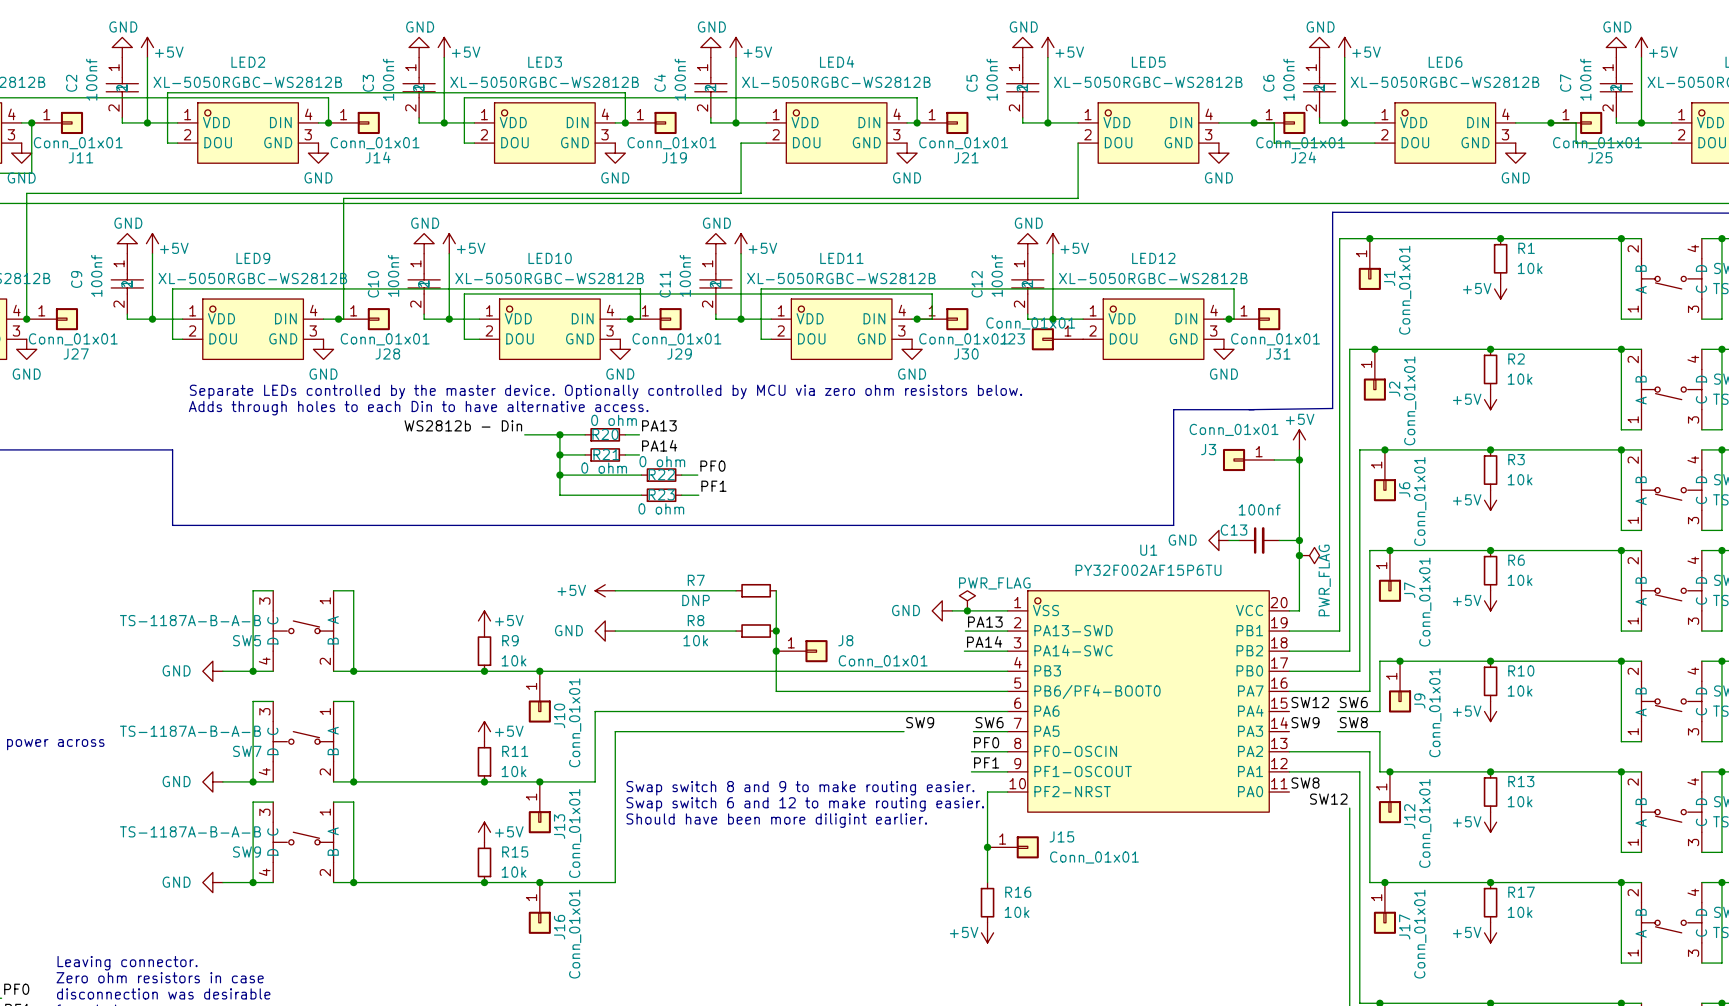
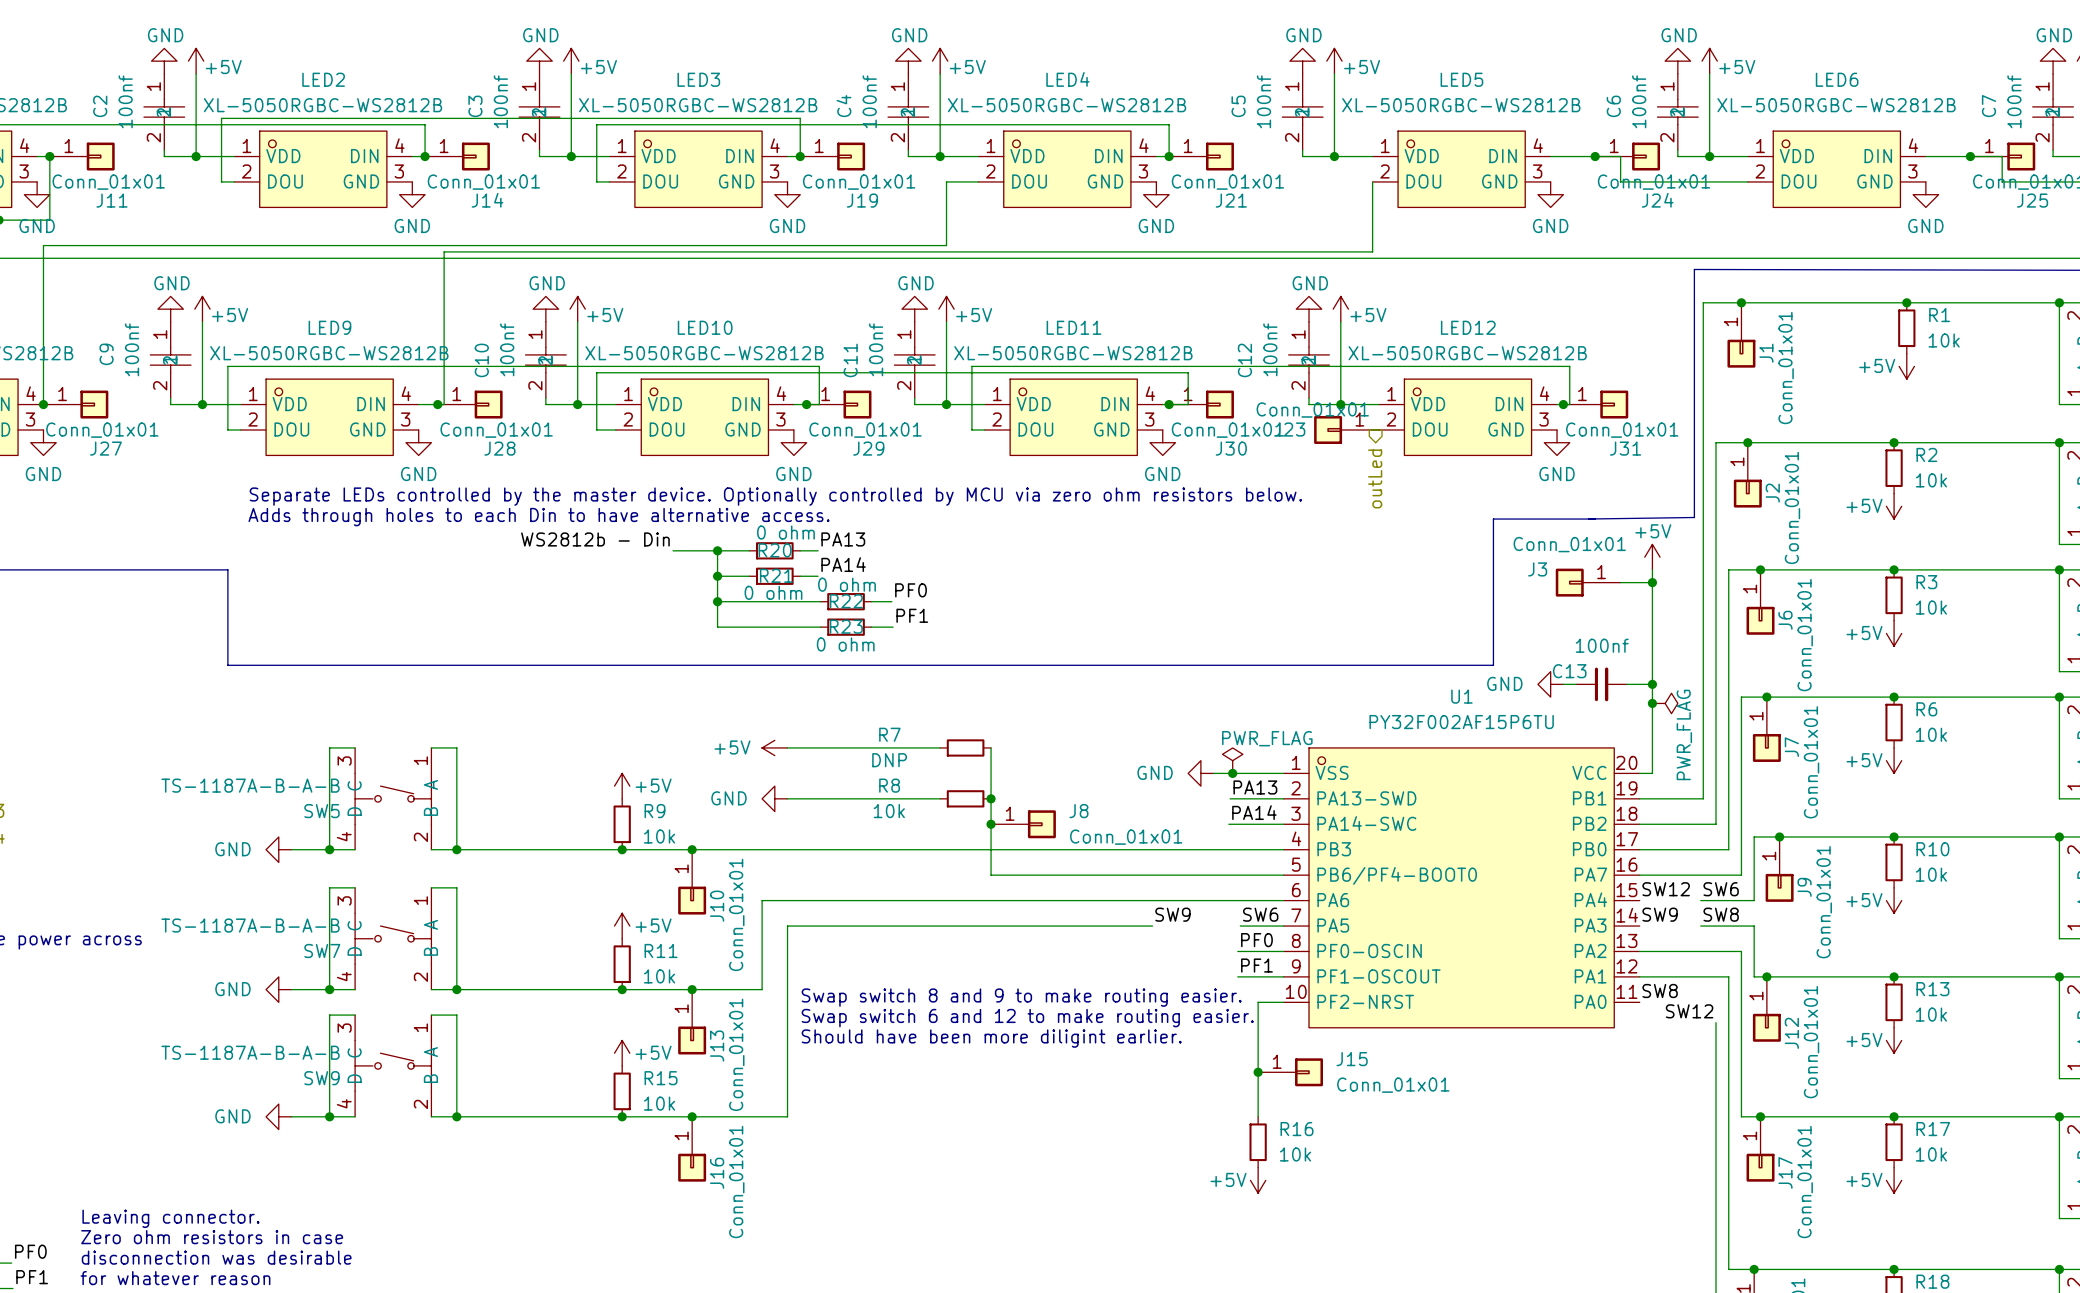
hierarchical label: none -> outLed (1375, 478)

